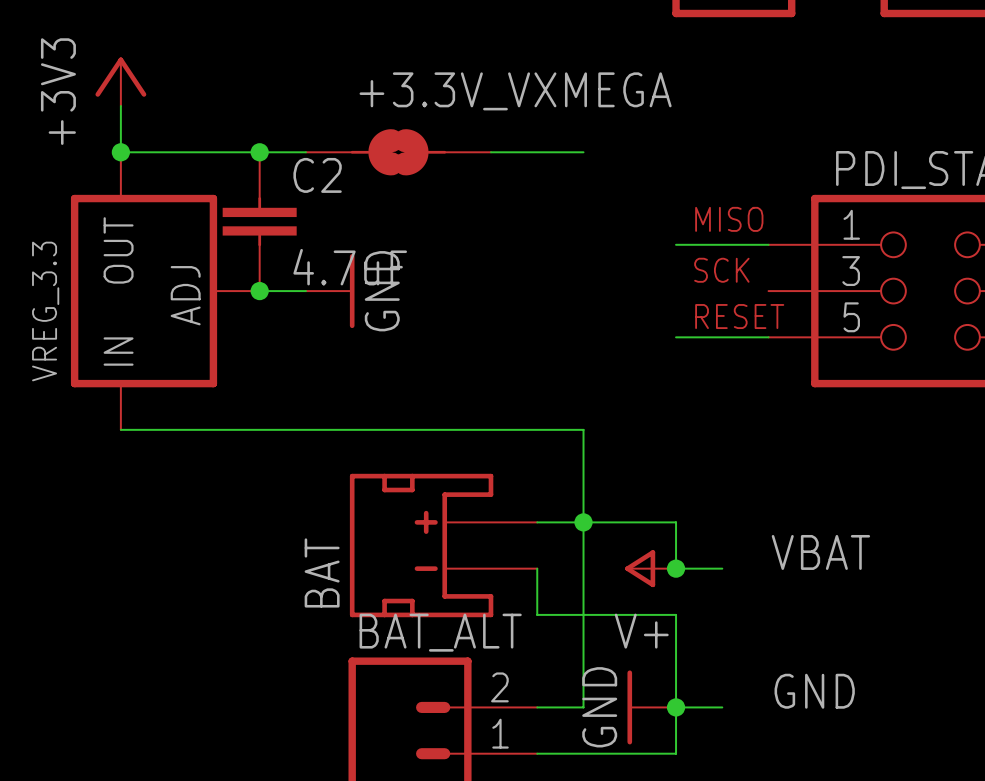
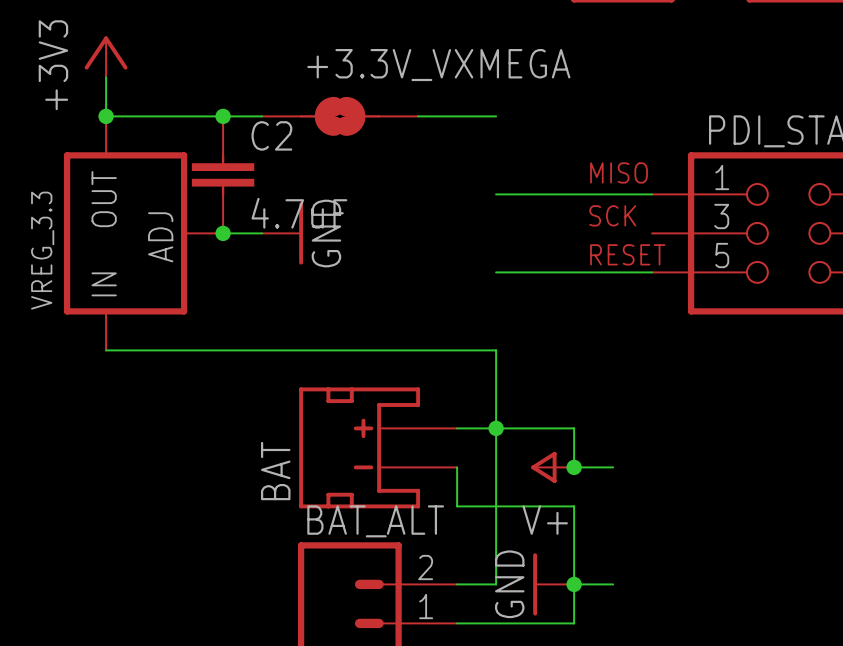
wire: none -> (496, 194) (574, 194)
wire: none -> (496, 272) (574, 272)
label: VBAT (820, 552) -> none
label: GND (814, 691) -> none

